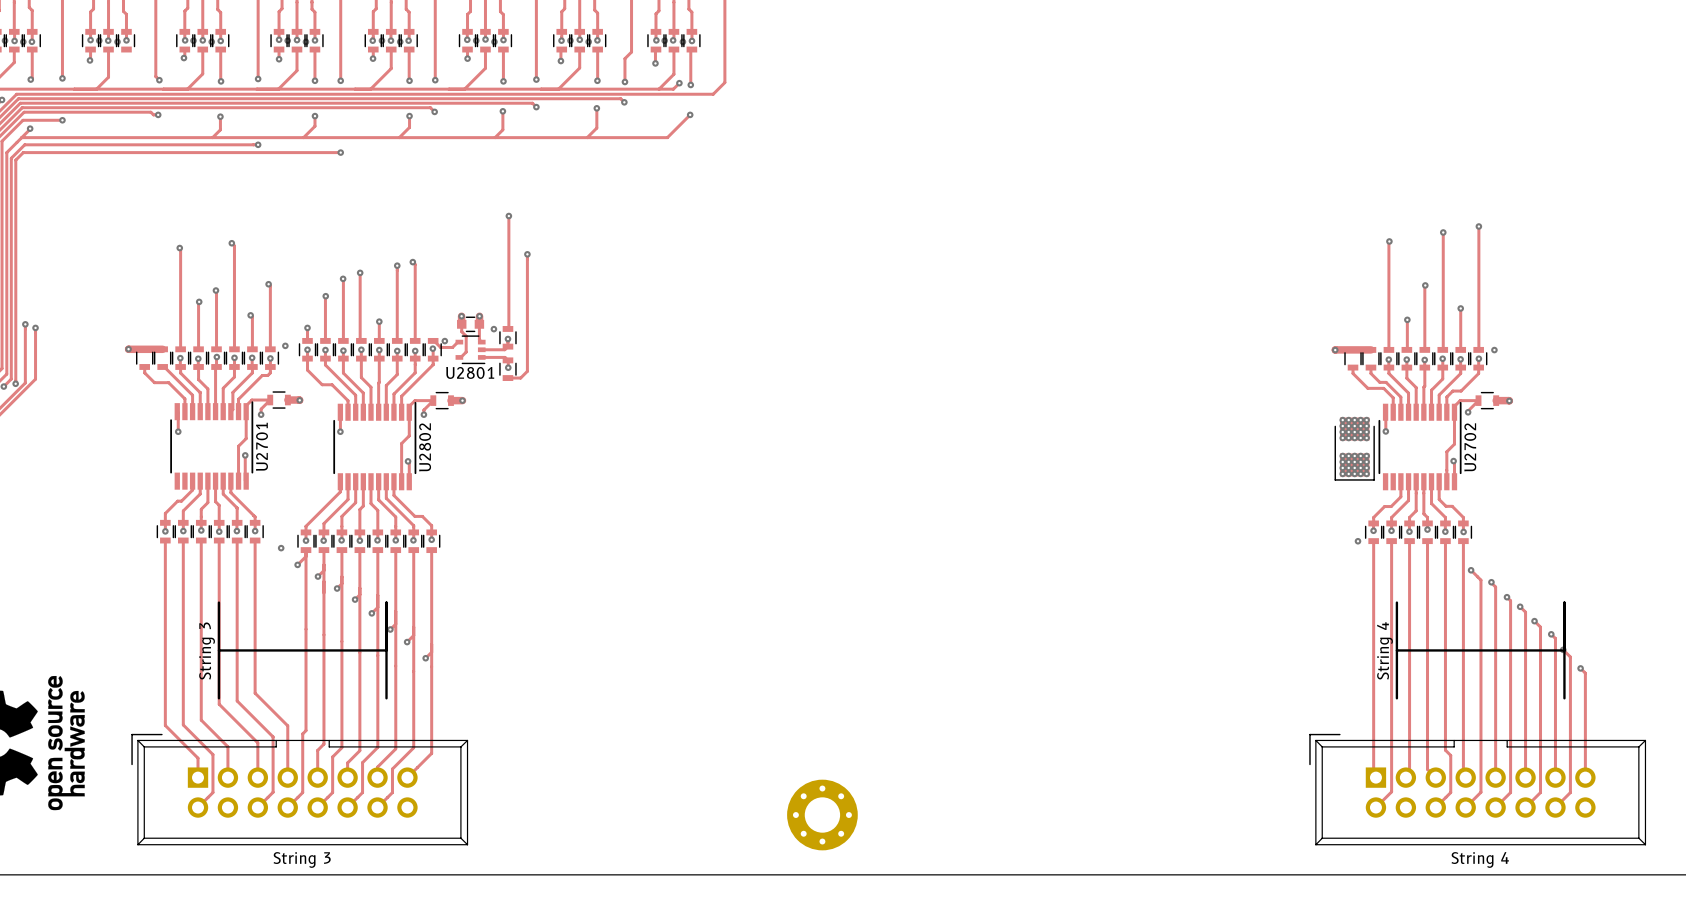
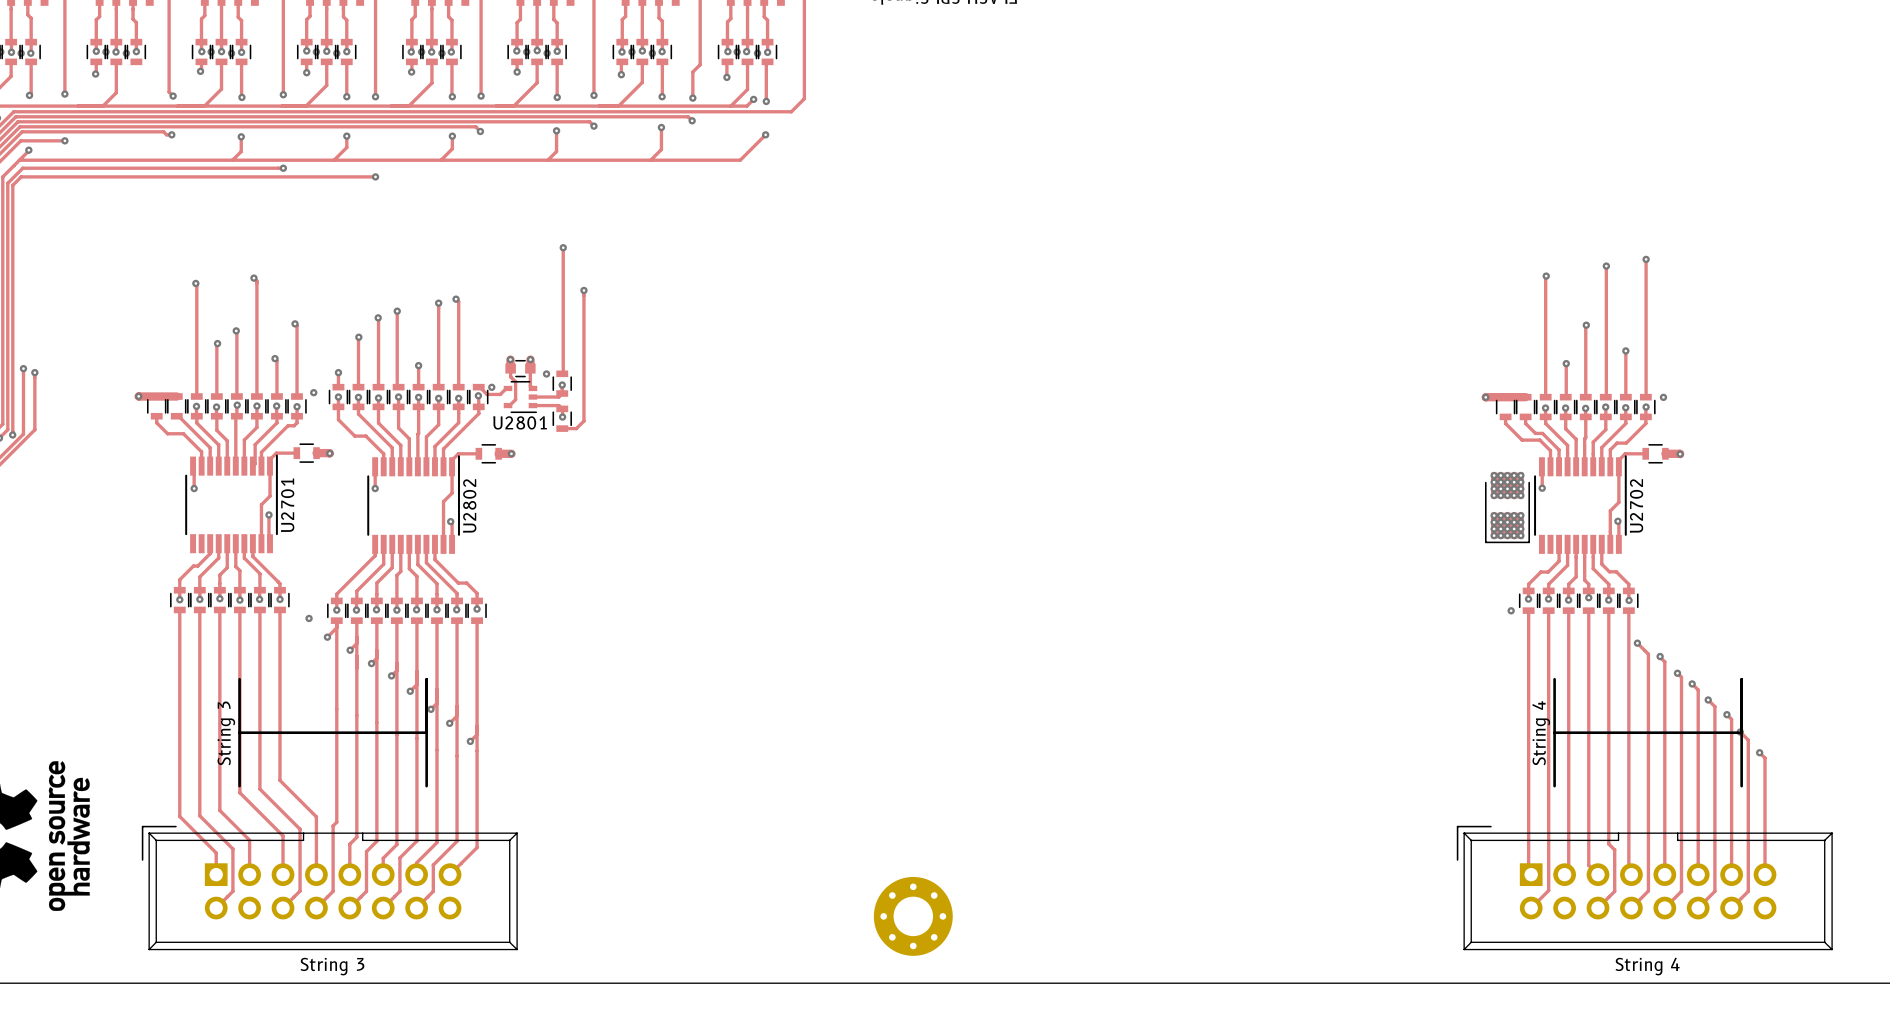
track: (270, 400) (261, 409) (261, 414) -> none
track: (433, 400) (423, 410) (423, 414) -> none
track: (1478, 400) (1468, 412) -> none
via: (1468, 412) -> none
via: (261, 414) -> none
via: (423, 414) -> none

